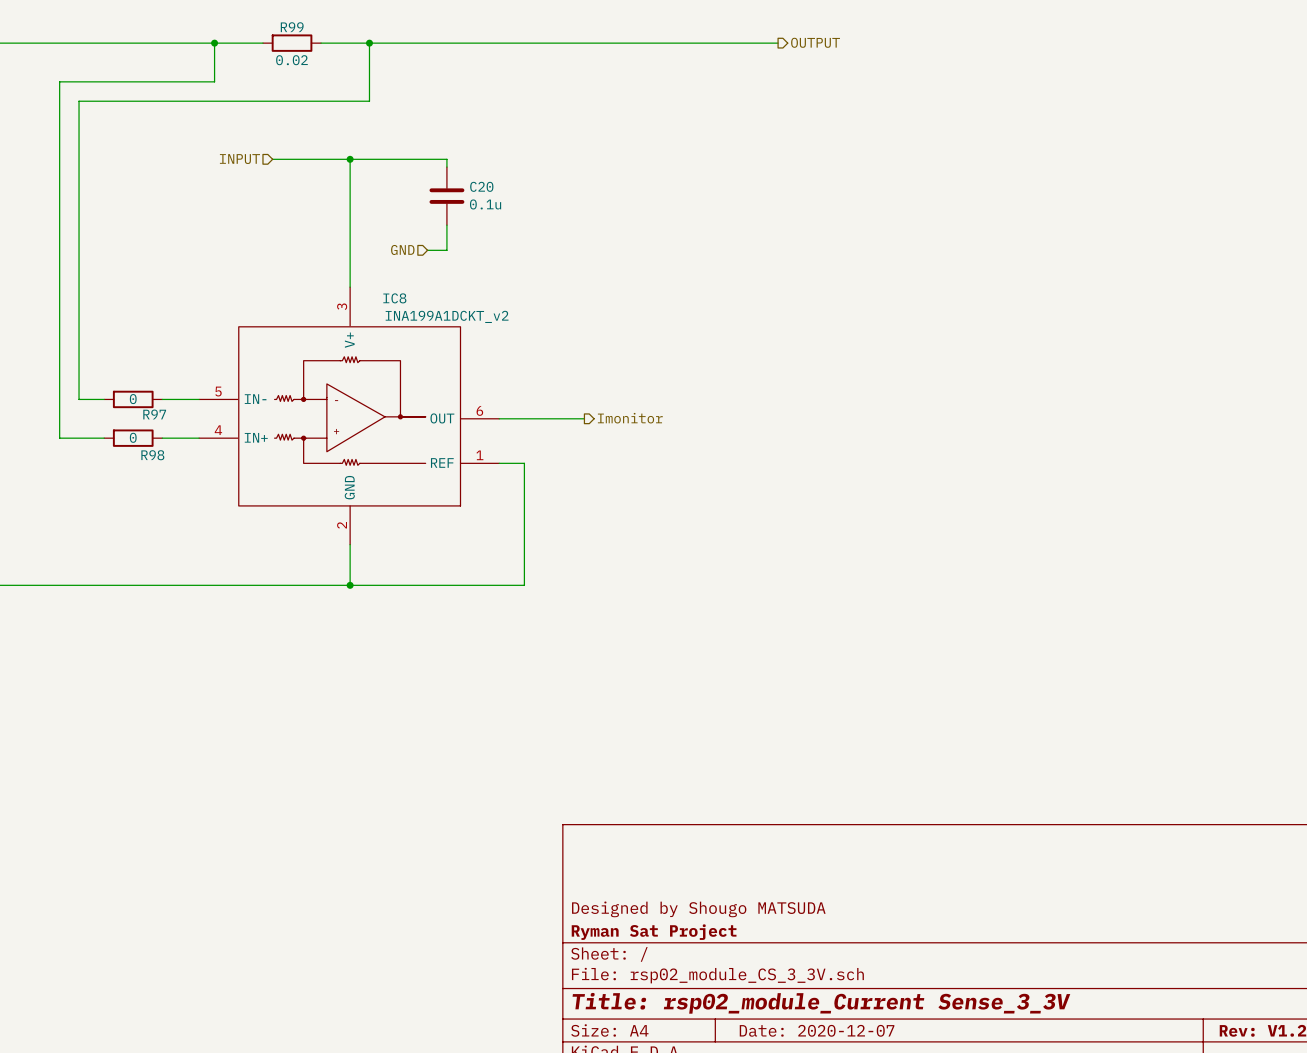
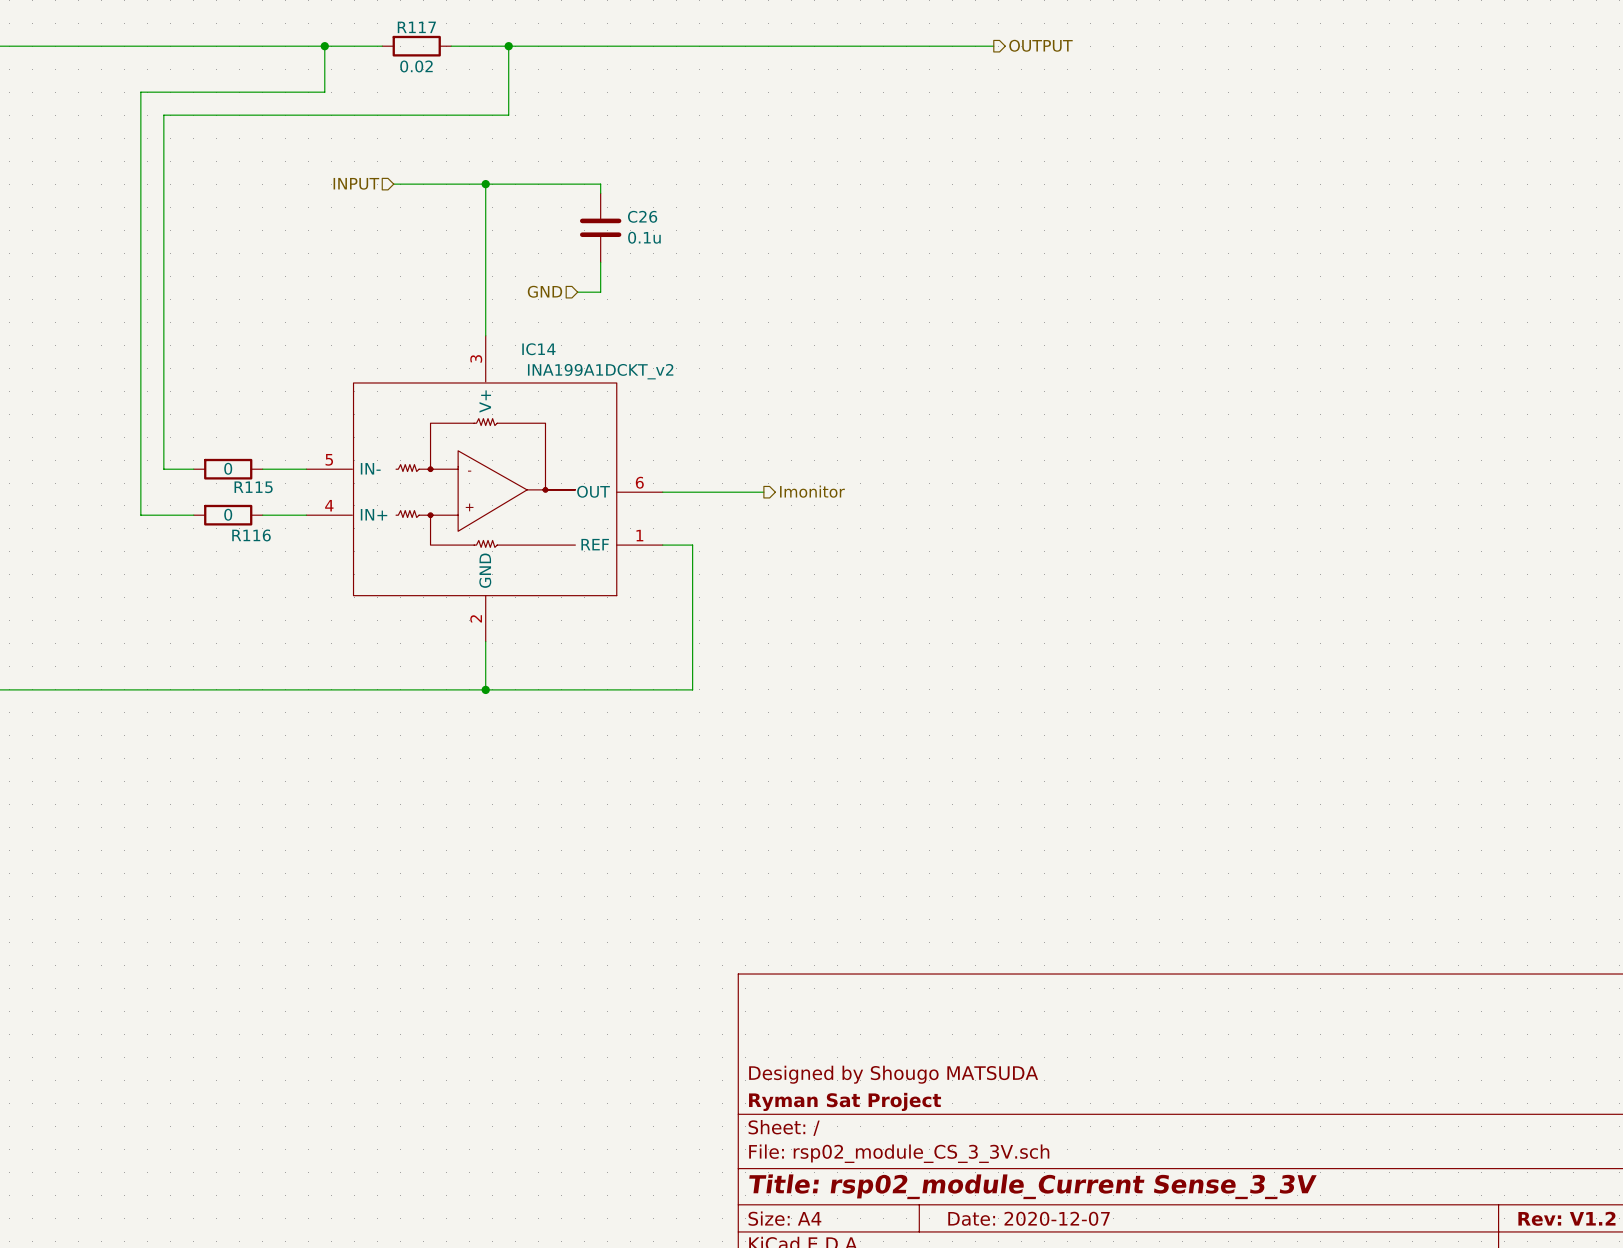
R99 name: R99 (292, 27) -> R117 (416, 27)
C20 name: C20 (481, 186) -> C26 (642, 216)
IC8 name: IC8 (394, 298) -> IC14 (538, 349)
R97 name: R97 (154, 414) -> R115 (253, 487)
R98 name: R98 (152, 455) -> R116 (251, 535)

